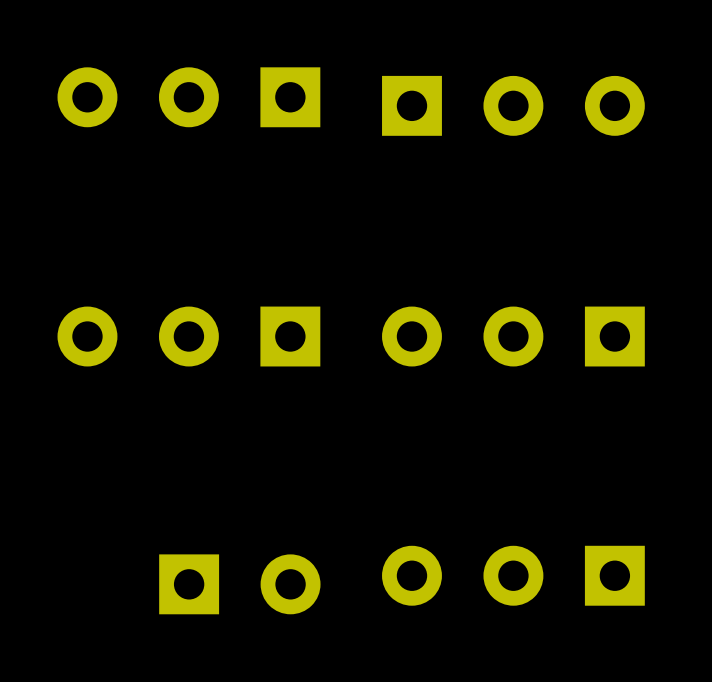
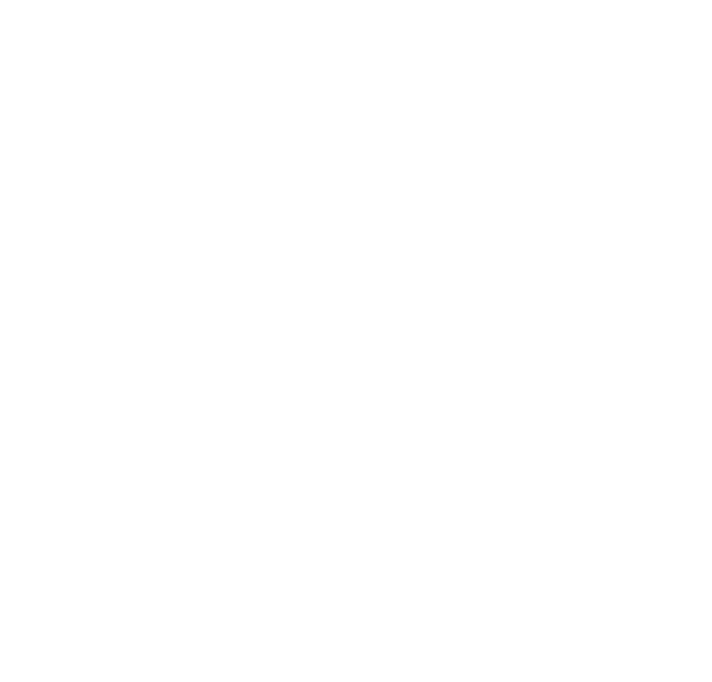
part: (188, 97) -> none
part: (513, 105) -> none
part: (188, 336) -> none
part: (513, 336) -> none
part: (513, 575) -> none
part: (239, 584) -> none

